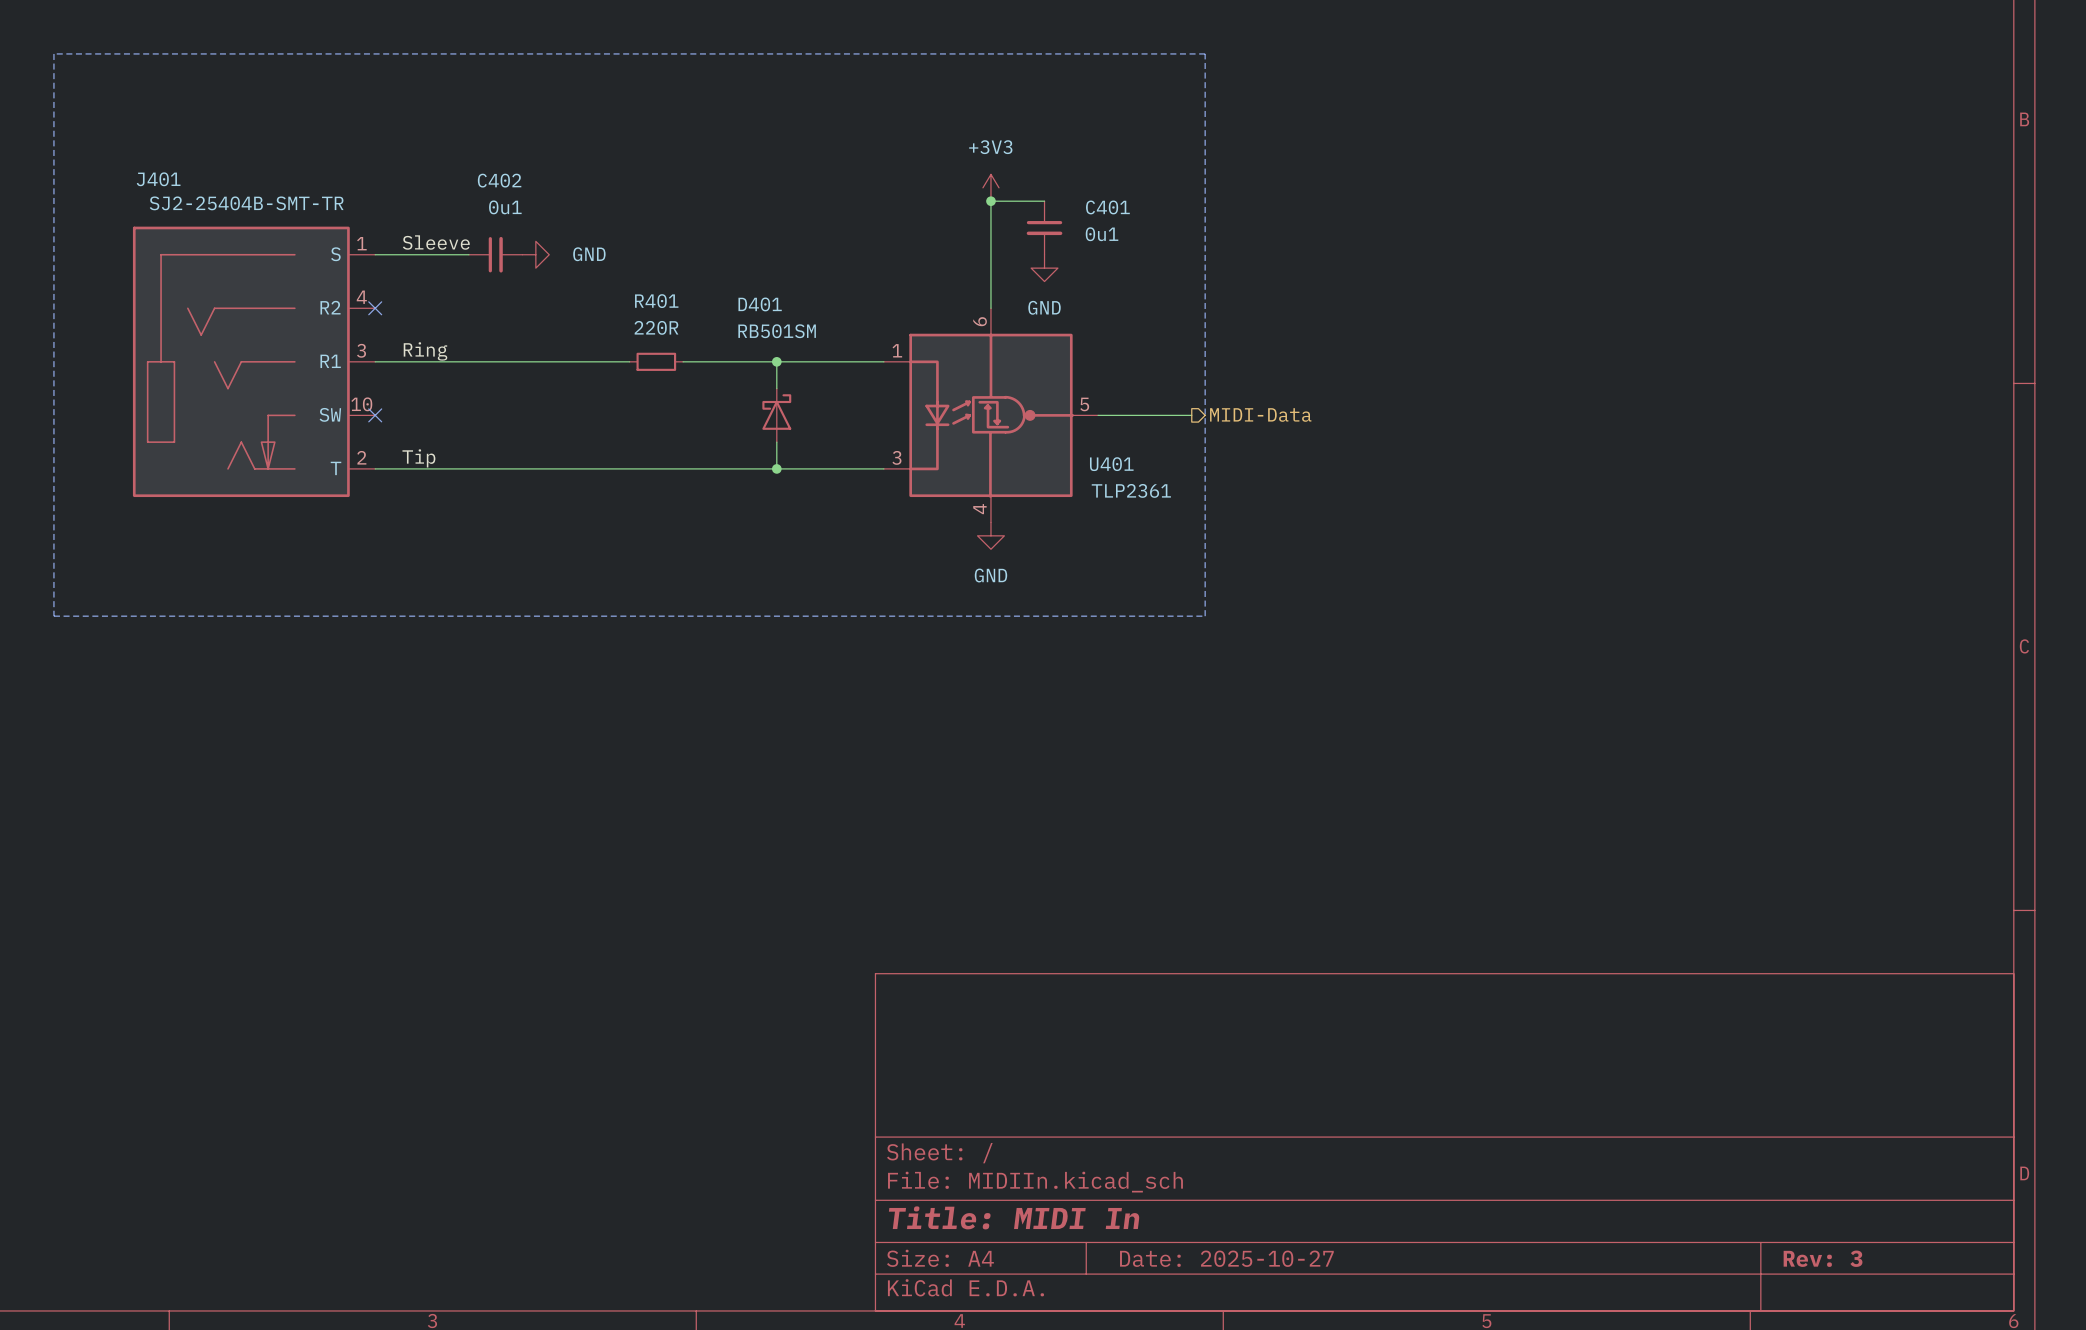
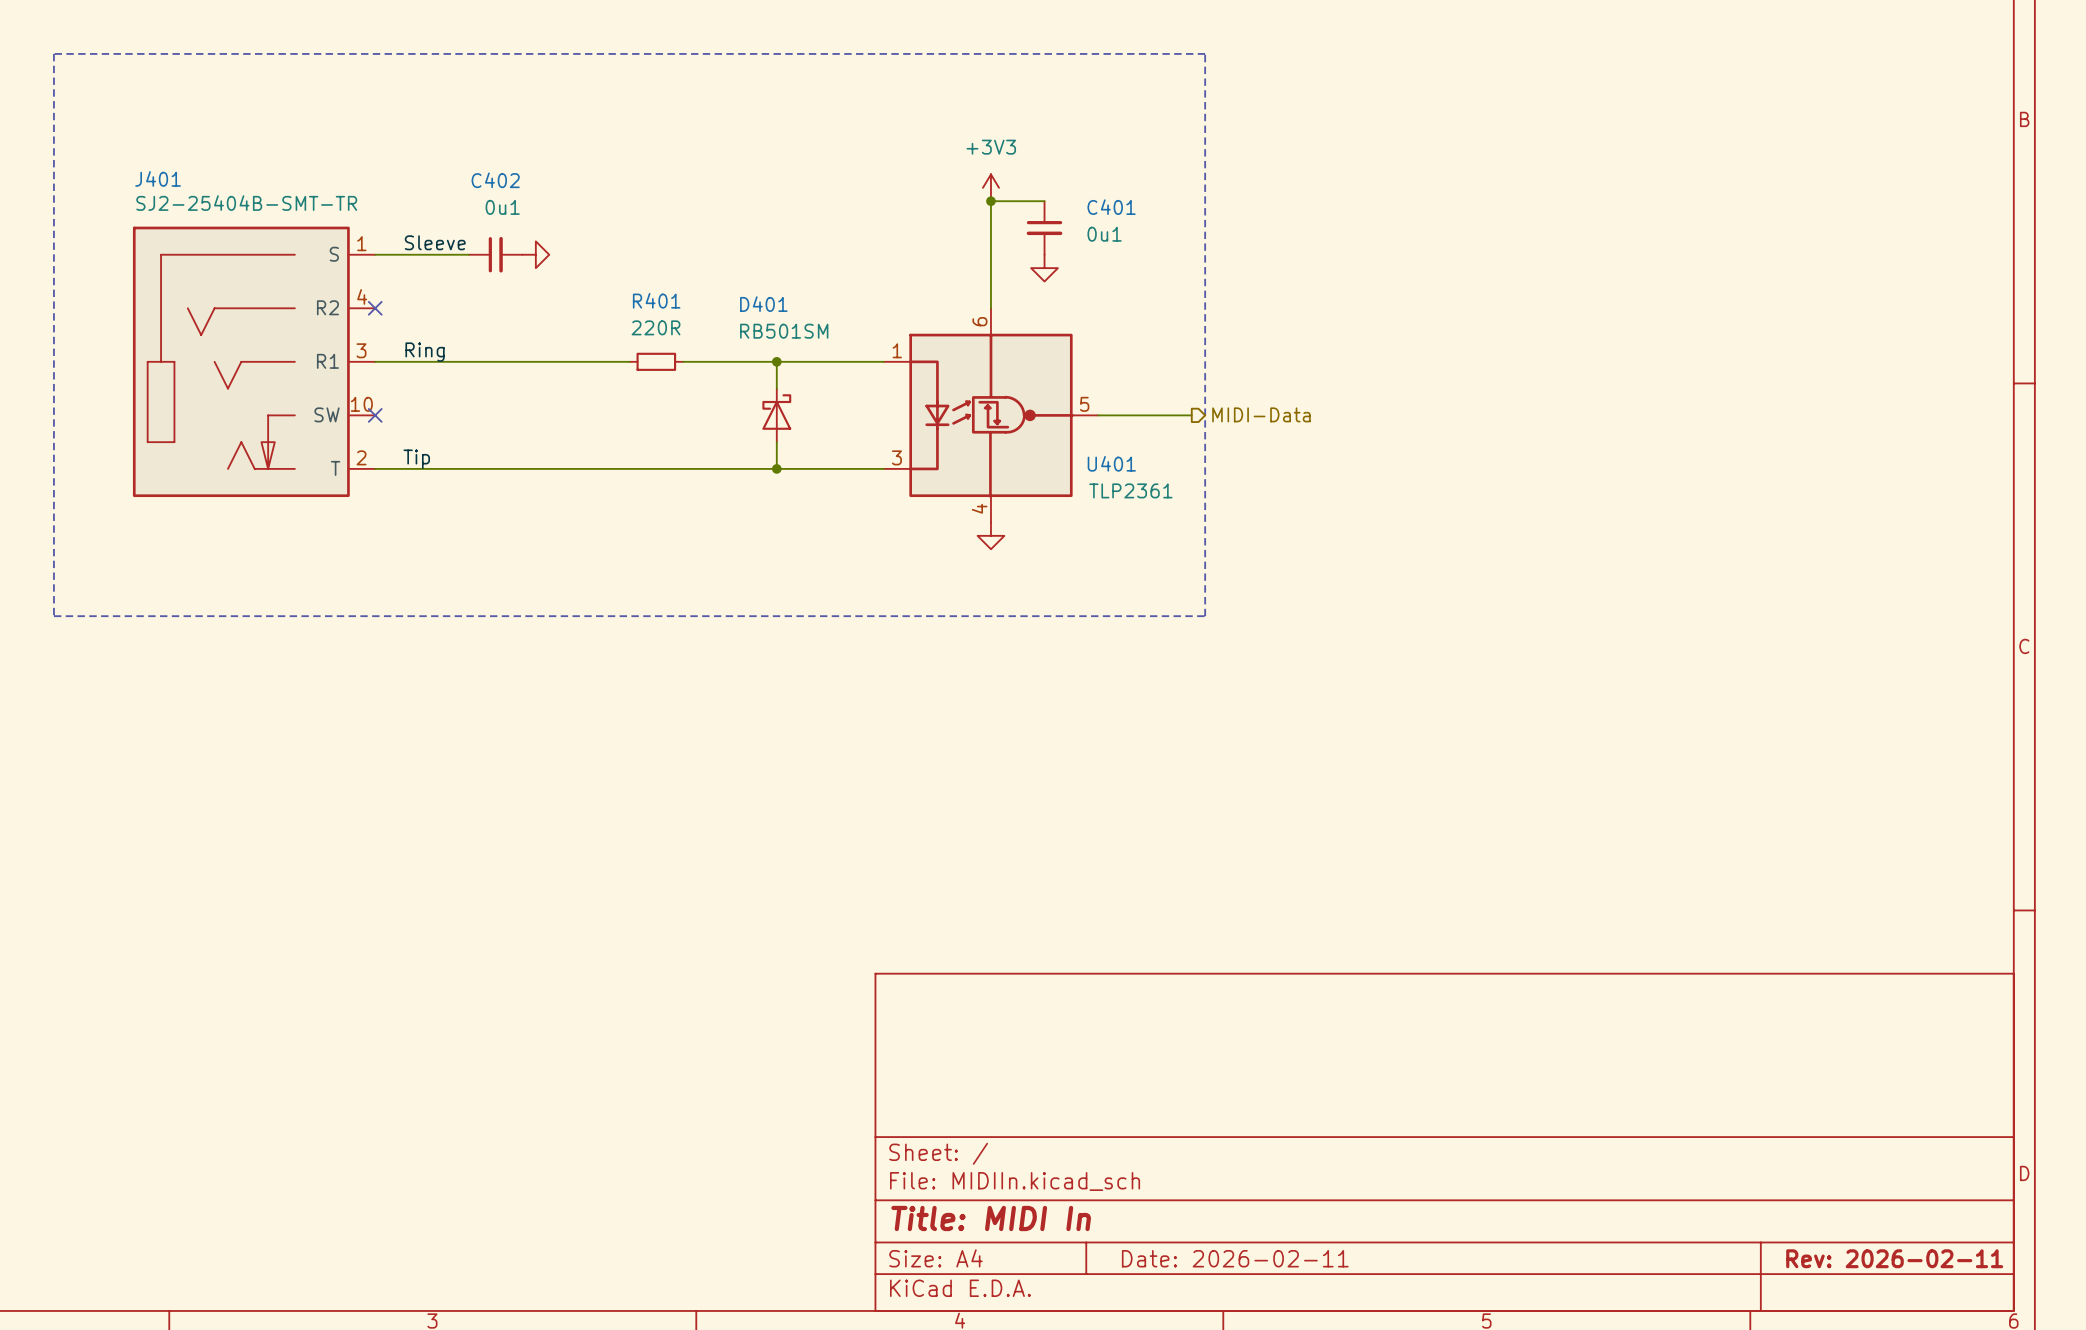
power symbol text: GND (589, 254) -> none
power symbol text: GND (1044, 307) -> none
power symbol text: GND (990, 575) -> none
title block: Date: 2025-10-27 (1226, 1258) -> Date: 2026-02-11 (1235, 1258)
title block: Rev: 3 (1823, 1258) -> Rev: 2026-02-11 (1894, 1258)

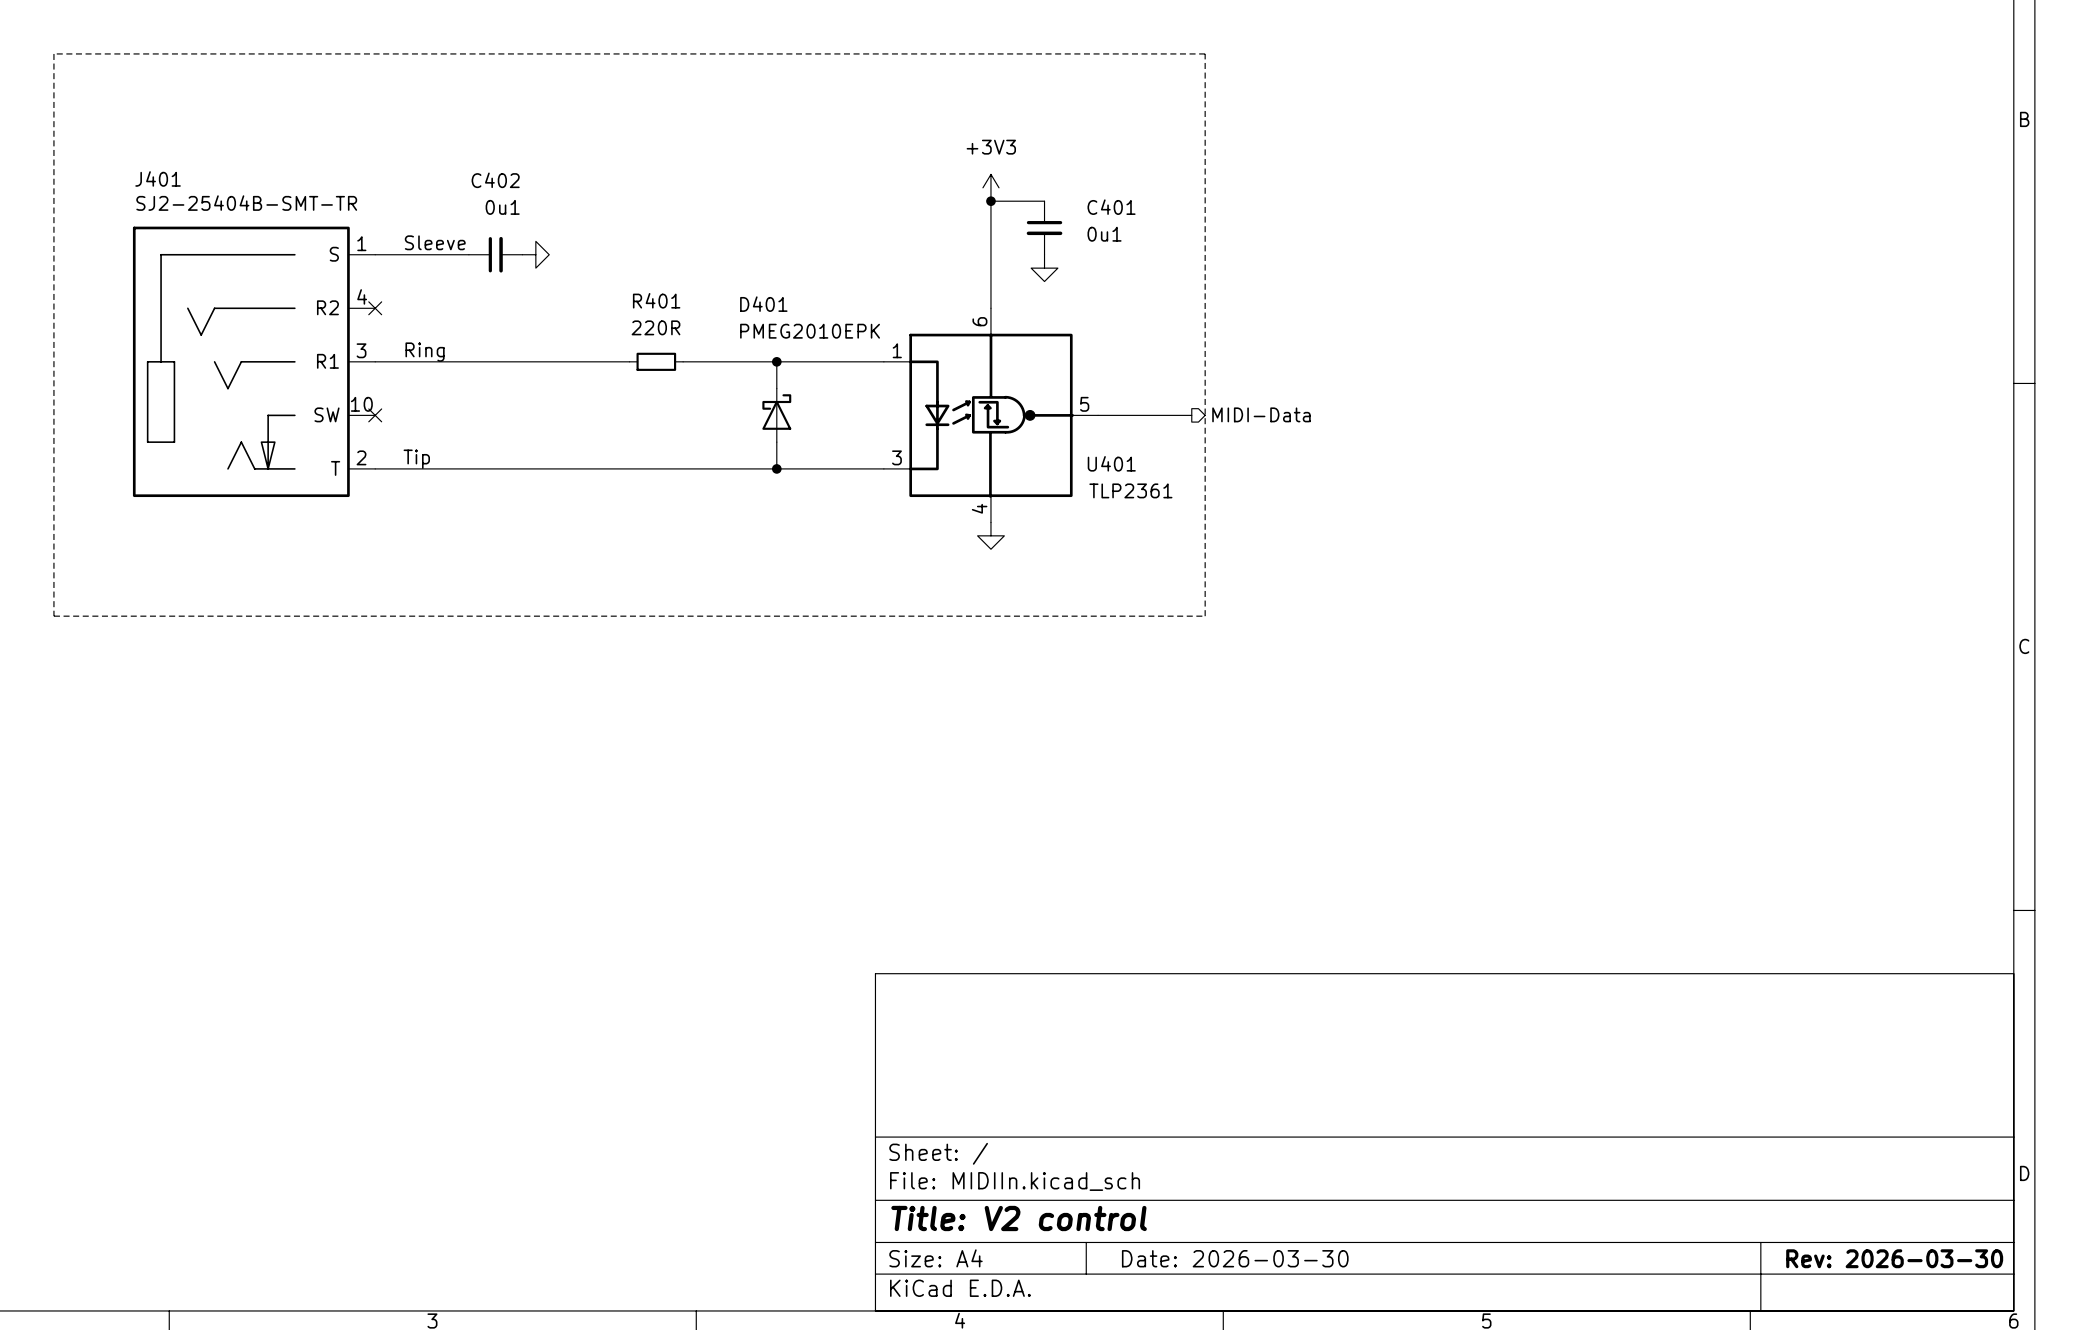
D401 value: RB501SM (784, 331) -> PMEG2010EPK (810, 331)
title block: Title: MIDI In (991, 1218) -> Title: V2 control (1019, 1218)
title block: Date: 2026-02-11 (1235, 1258) -> Date: 2026-03-30 (1235, 1258)
title block: Rev: 2026-02-11 (1894, 1258) -> Rev: 2026-03-30 (1894, 1258)

